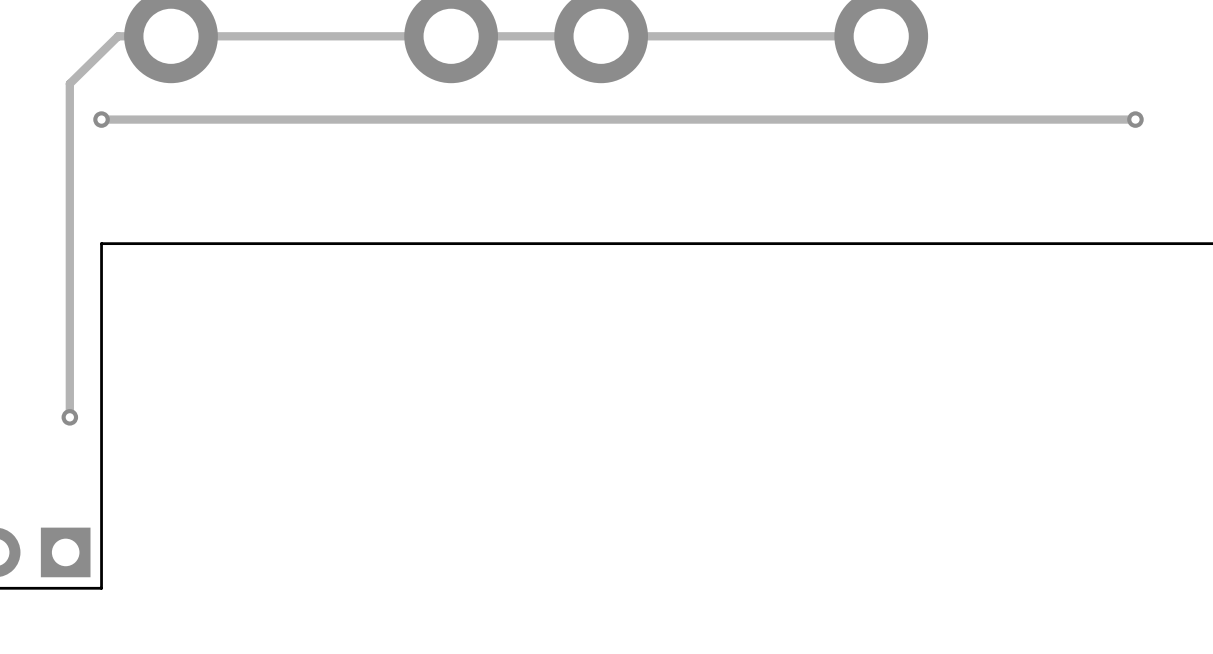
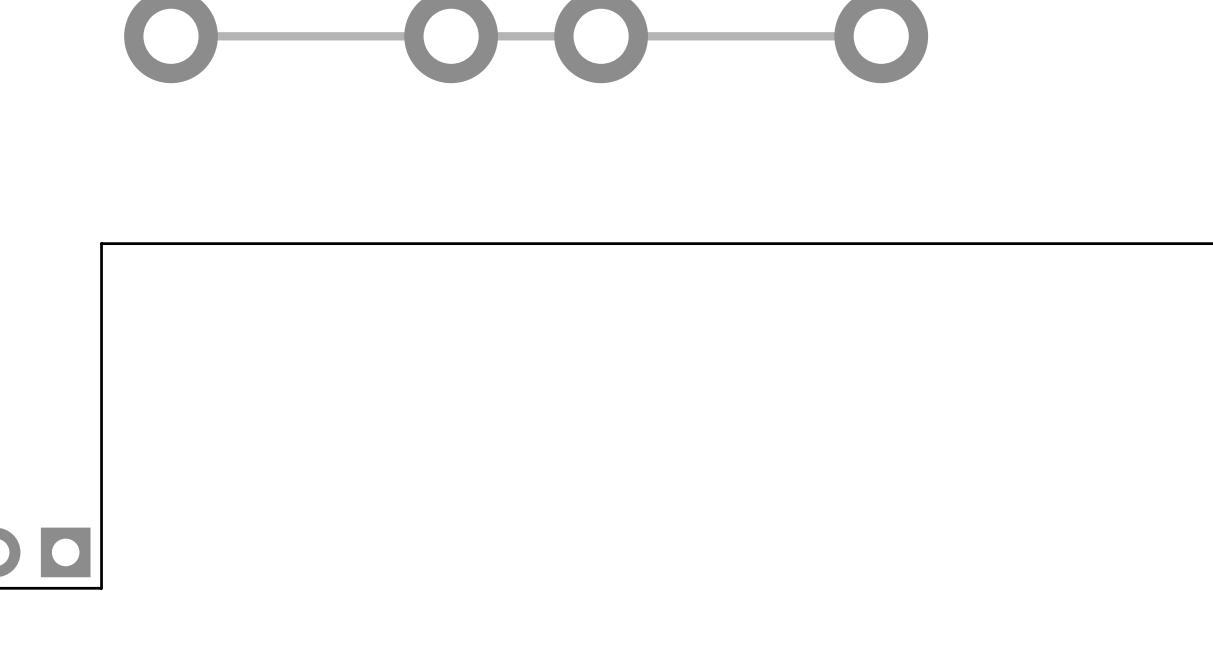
track: (171, 36) (118, 36) (69, 83) (69, 417) -> none
via: (101, 119) -> none
track: (1135, 119) (101, 119) -> none
via: (1135, 119) -> none
via: (69, 417) -> none

